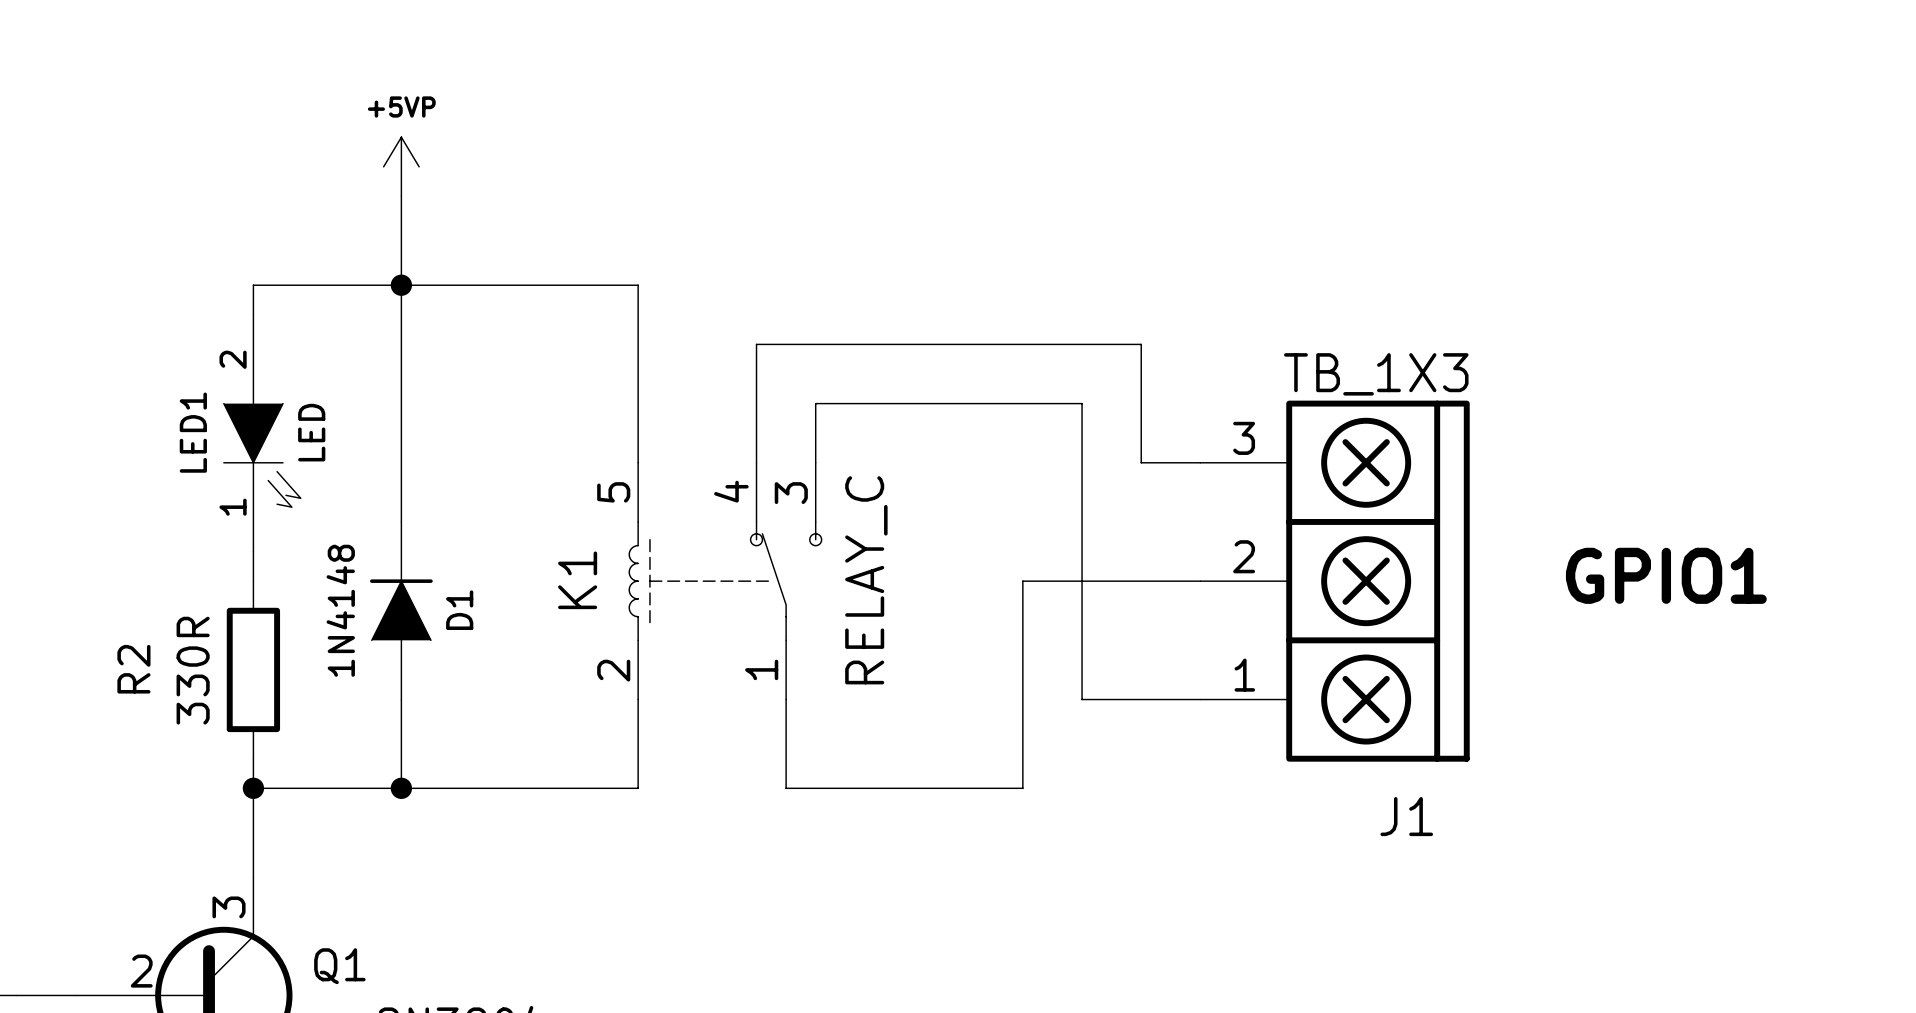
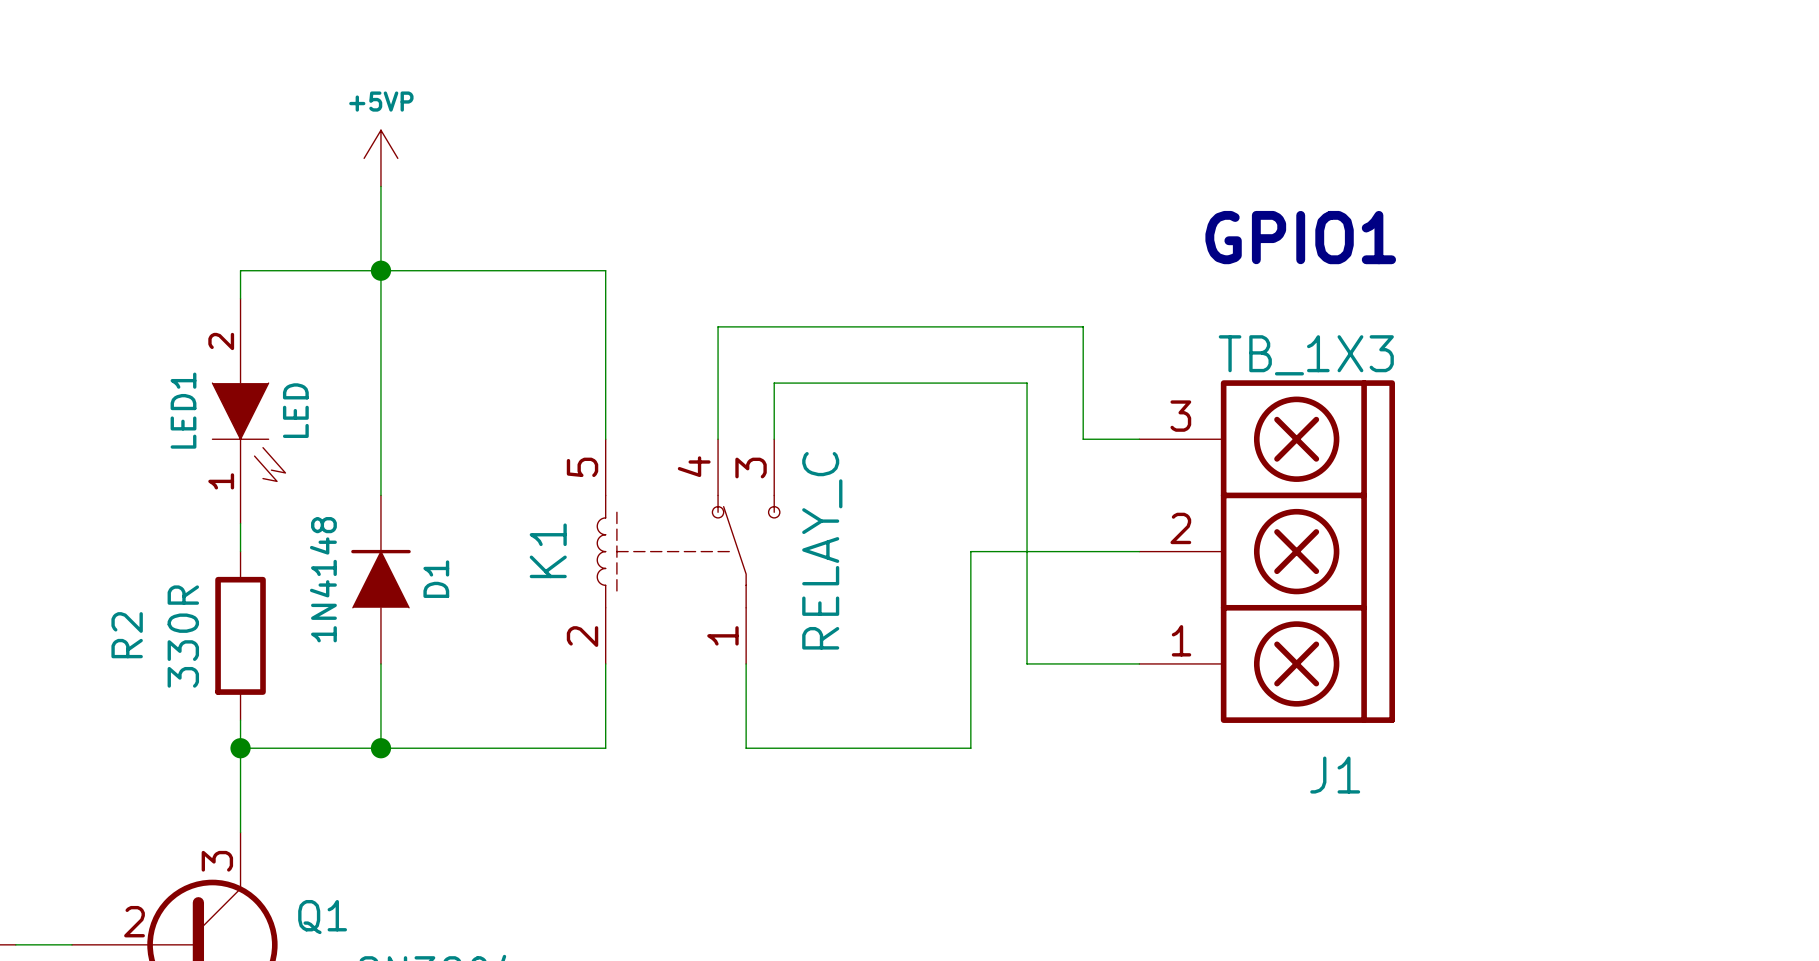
text position: GPIO1 (1666, 575) -> GPIO1 (1300, 237)

